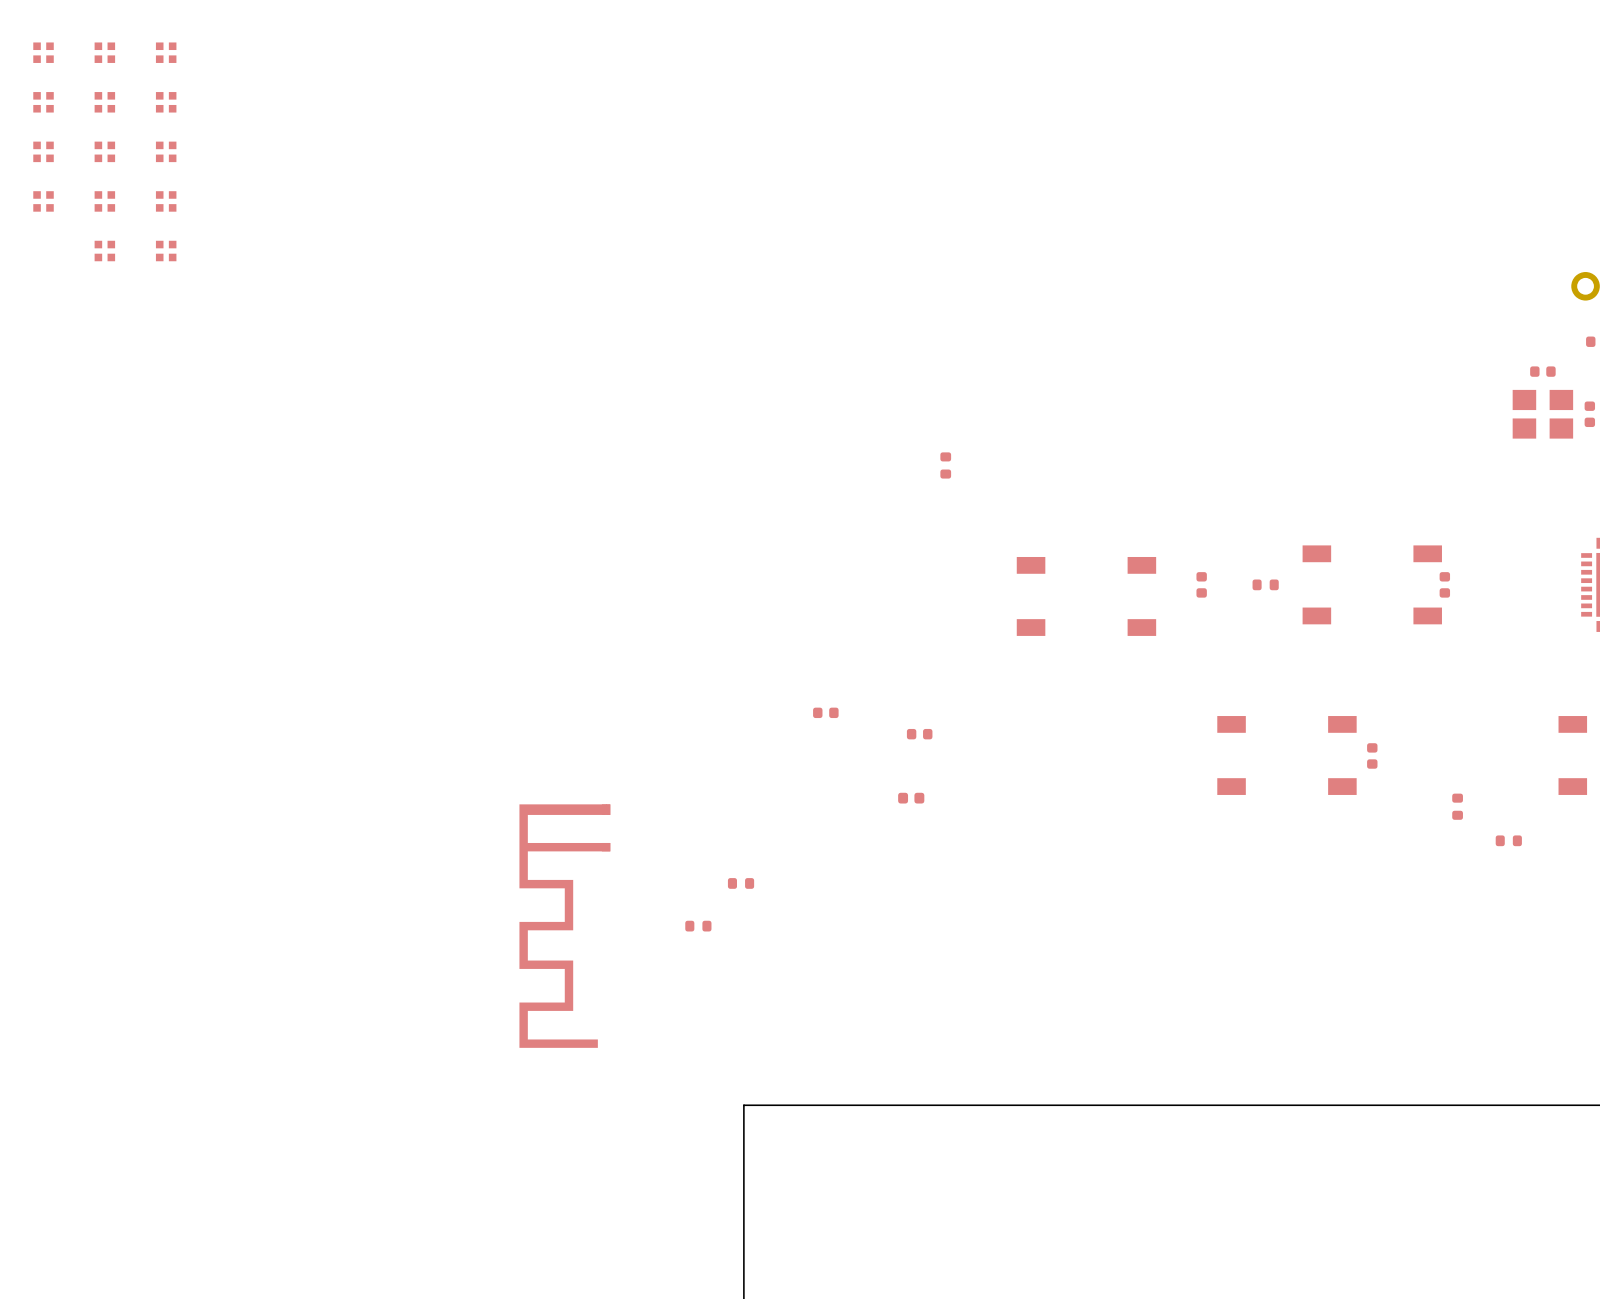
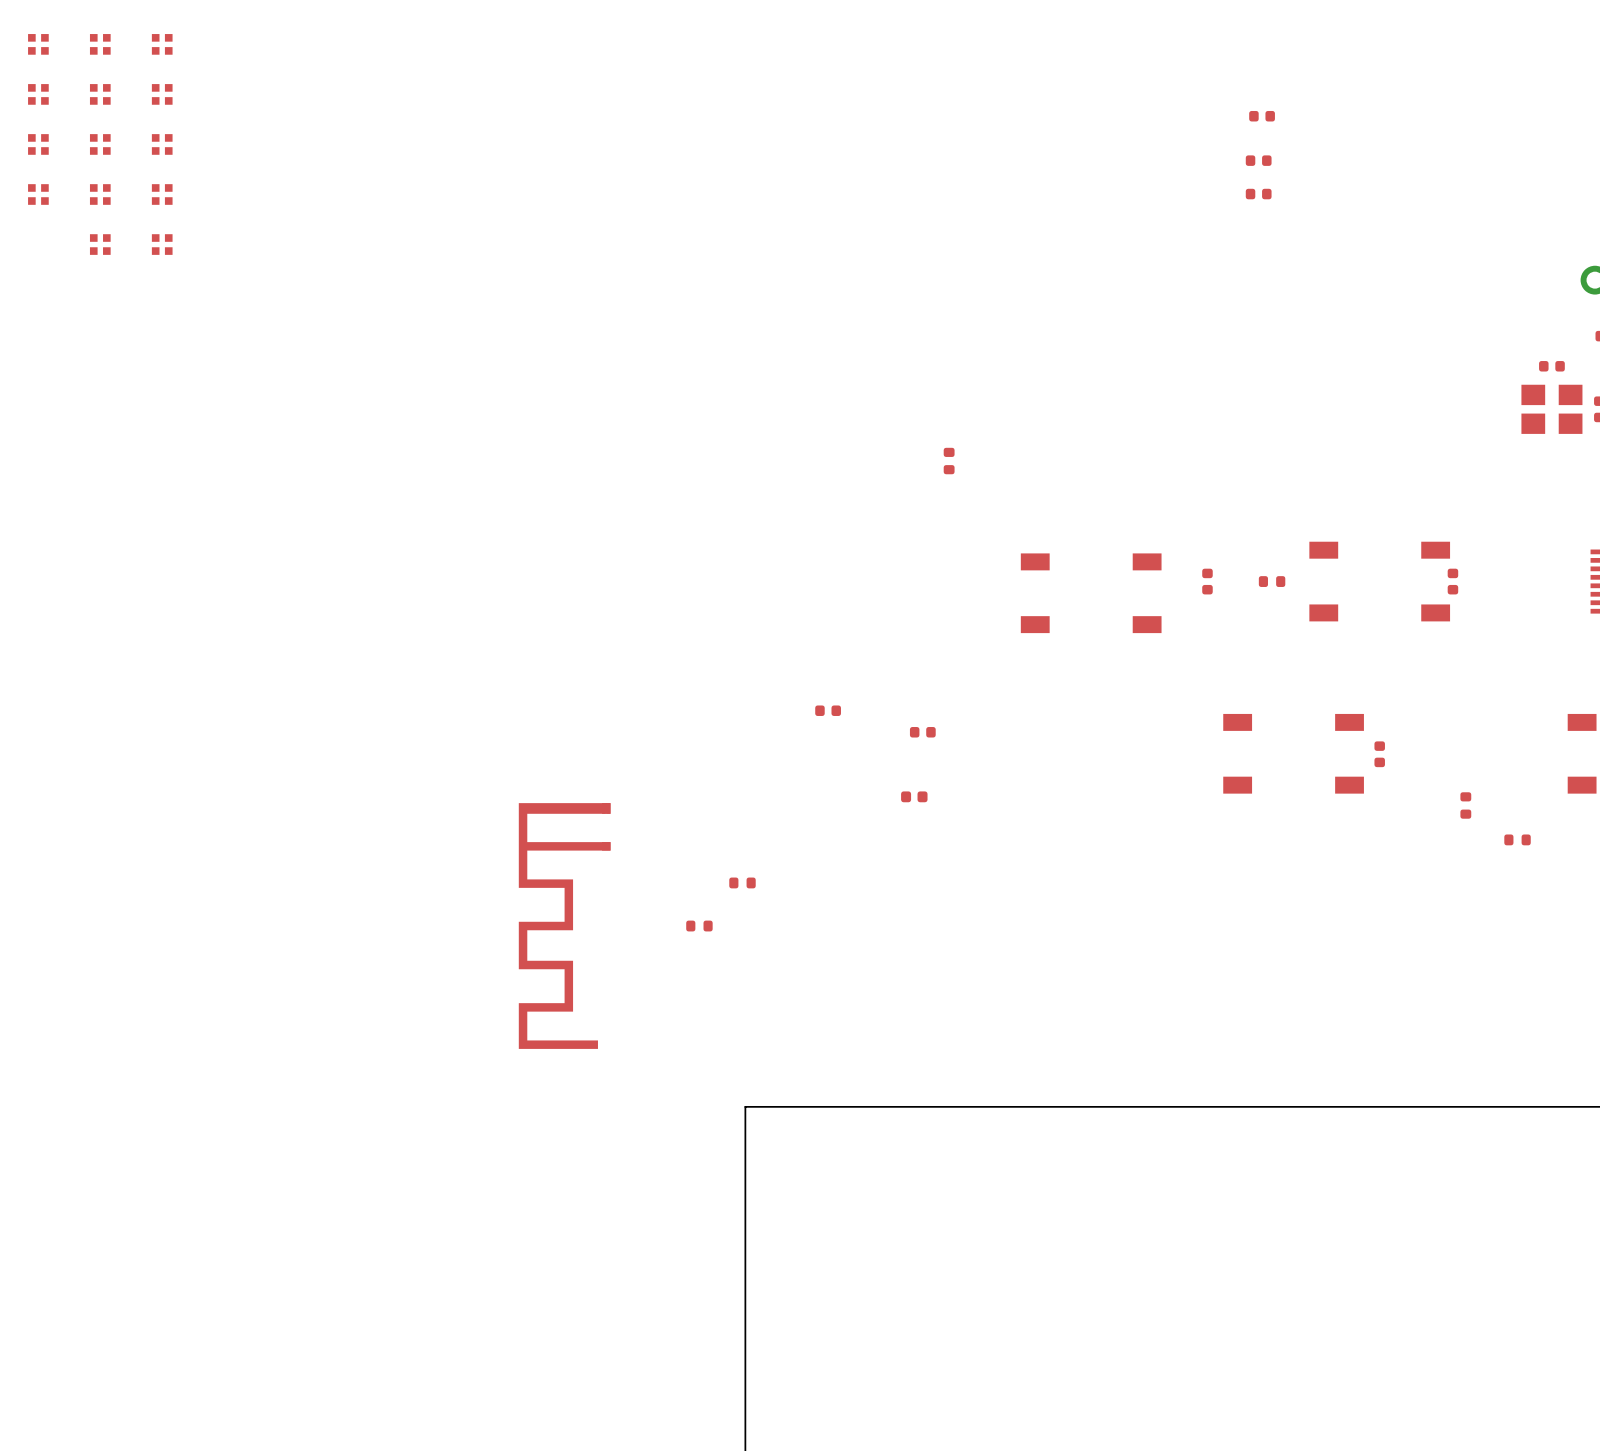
part: none -> (1262, 116)
part: none -> (1258, 160)
part: none -> (1258, 194)

